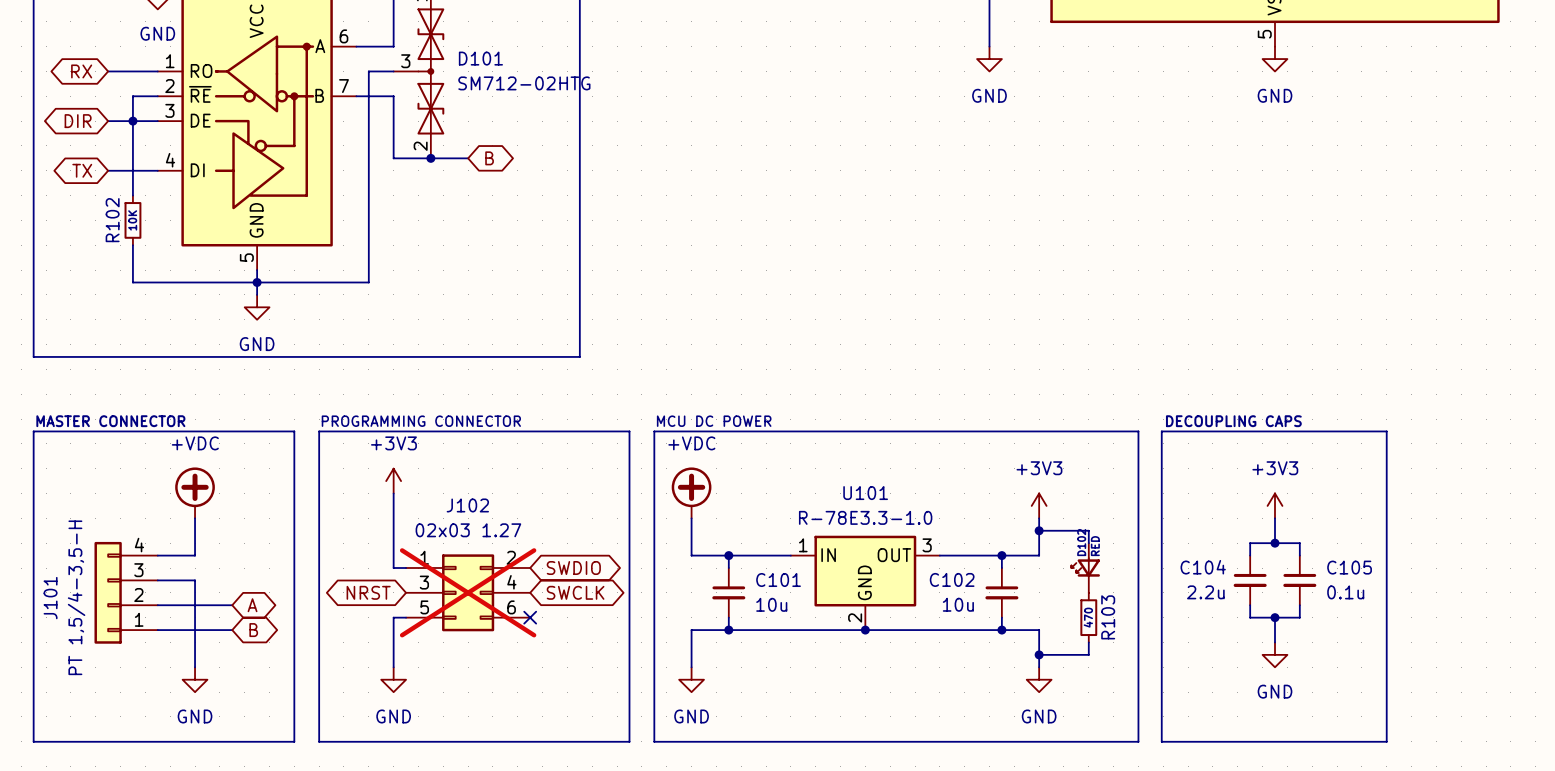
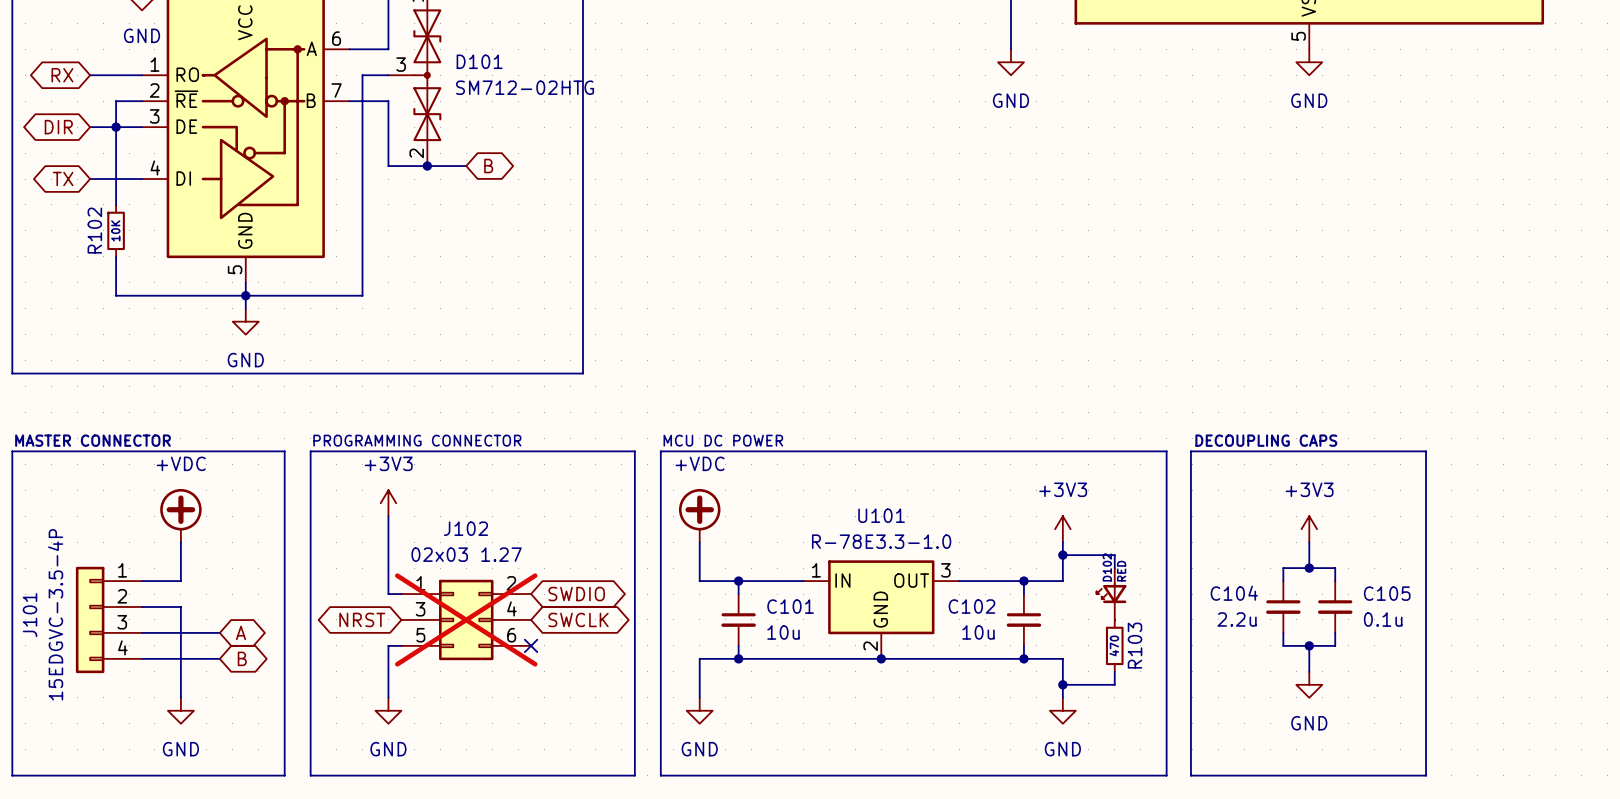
J101 flip: as is (108, 592) -> up-down (90, 619)
J101 value: PT 1,5/4-3,5-H (76, 597) -> 15EDGVC-3.5-4P (55, 614)

